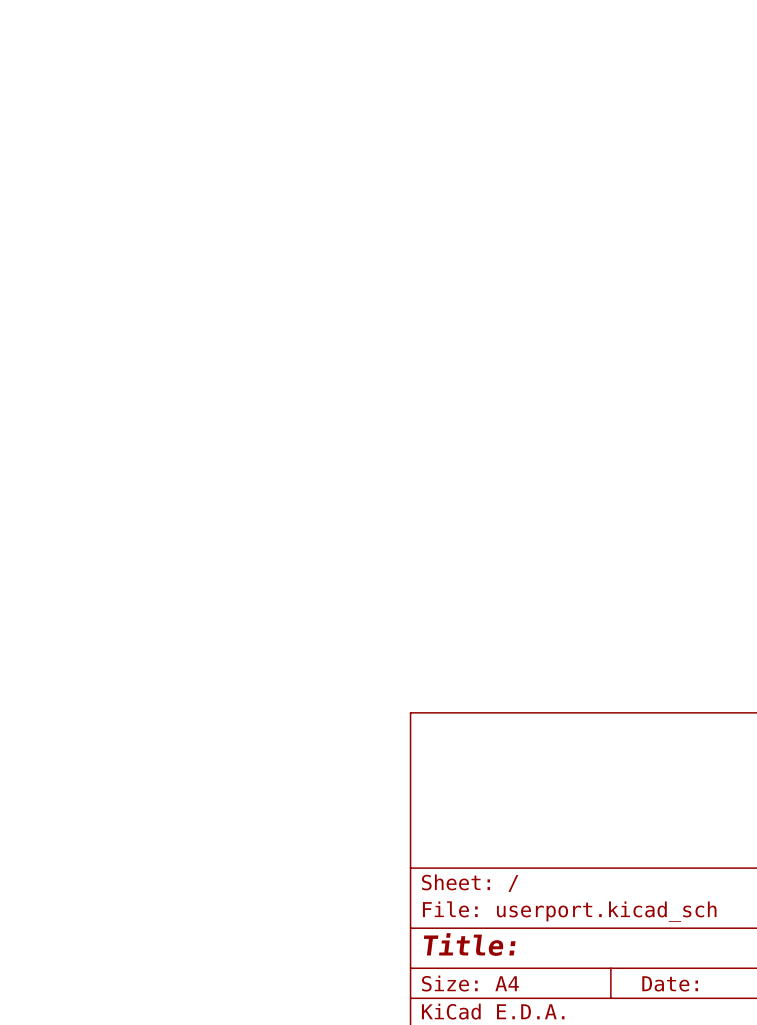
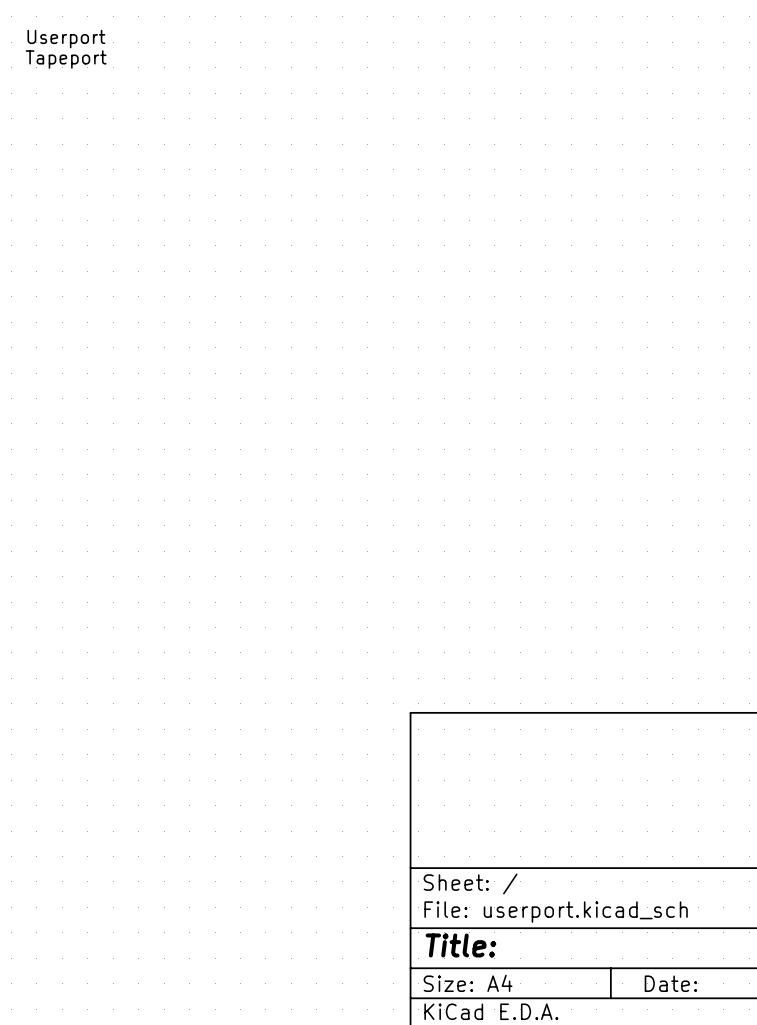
text: none -> Userport (66, 39)
text: none -> Tapeport (66, 59)

